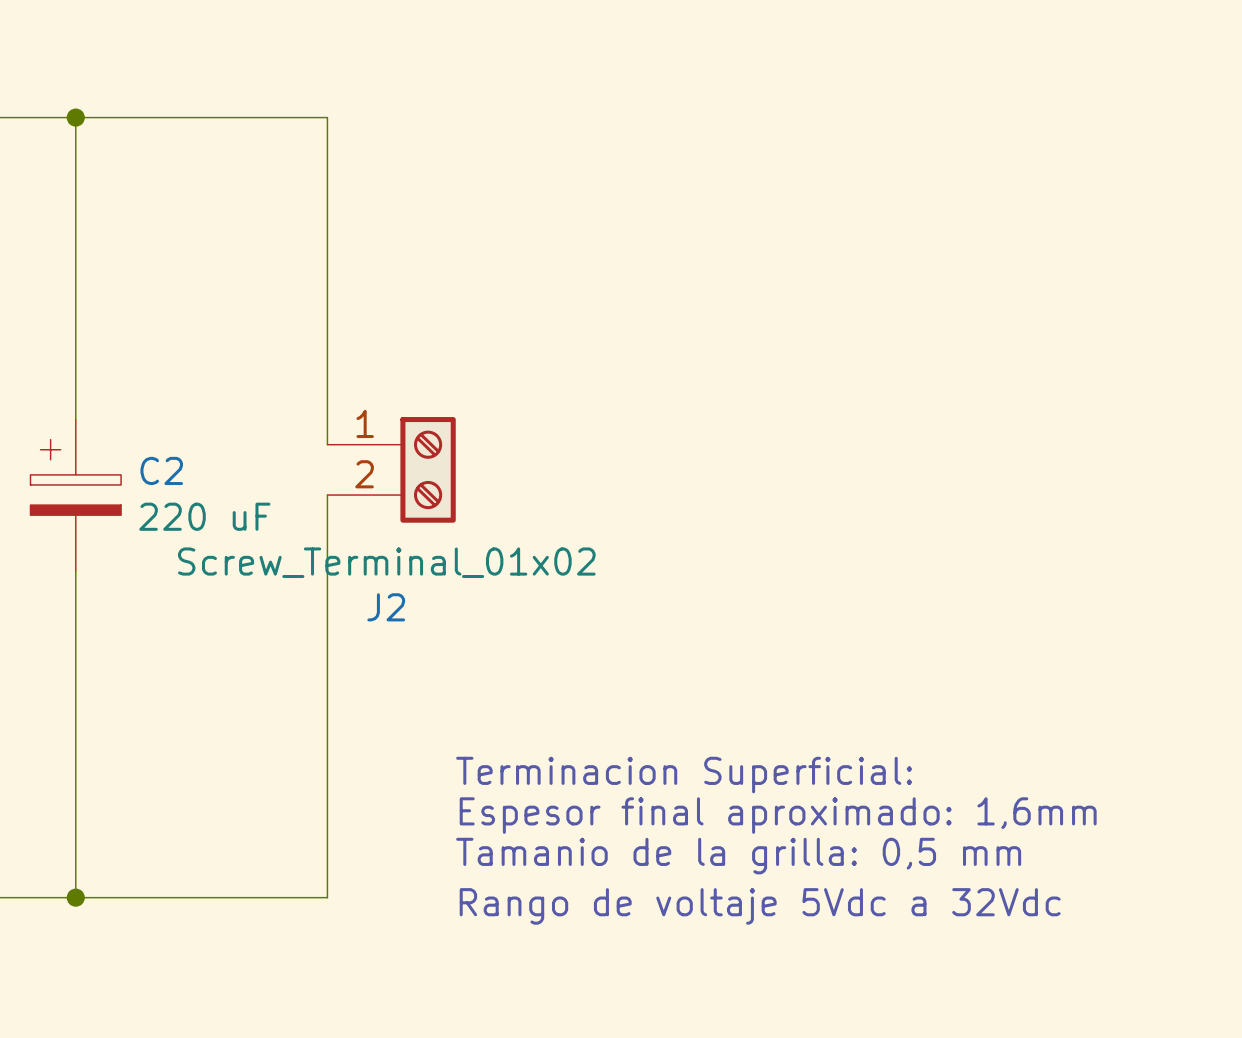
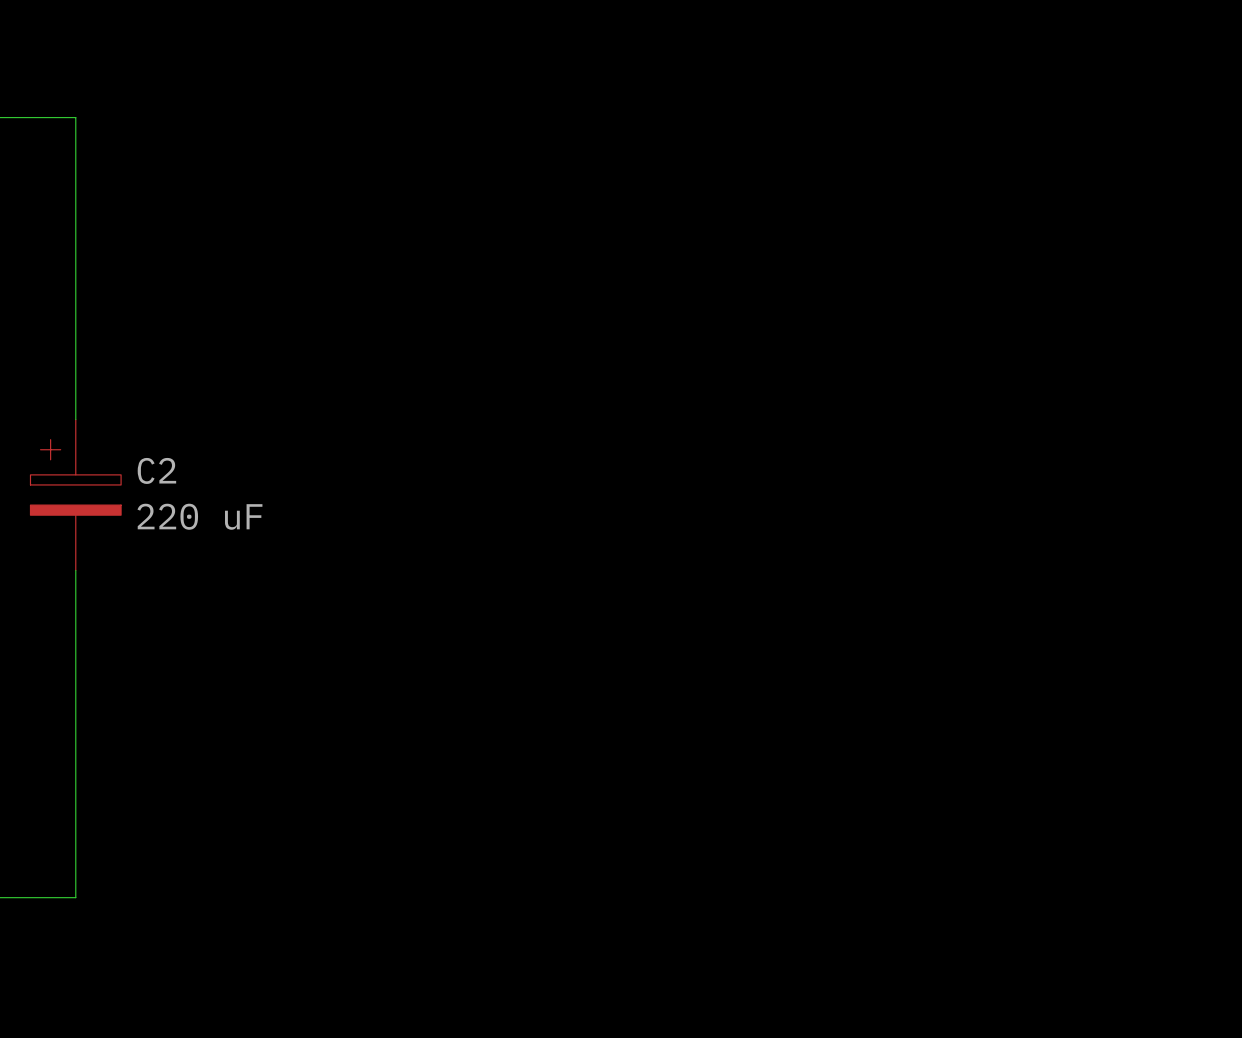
wire: (75, 117) (327, 117) (327, 444) -> none
junction: (75, 117) -> none
J2: Screw_Terminal_01x02 (391, 469) -> none
wire: (327, 495) (327, 897) (75, 897) -> none
text: Terminacion Superficial: (684, 775) -> none
text: Espesor final aproximado: 1,6mm (778, 815) -> none
text: Tamanio de la grilla: 0,5 mm (738, 856) -> none
junction: (75, 897) -> none
text: Rango de voltaje 5Vdc a 32Vdc (760, 906) -> none

